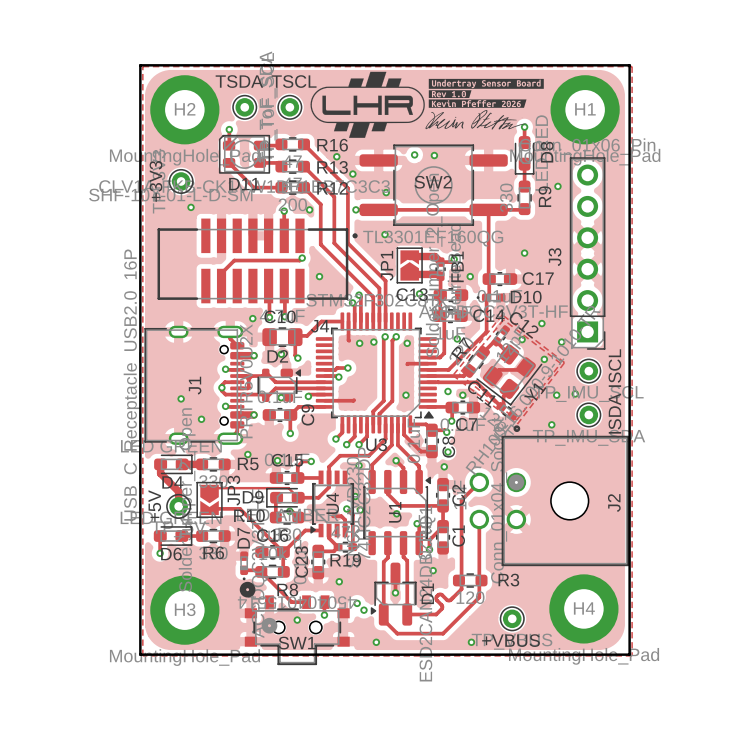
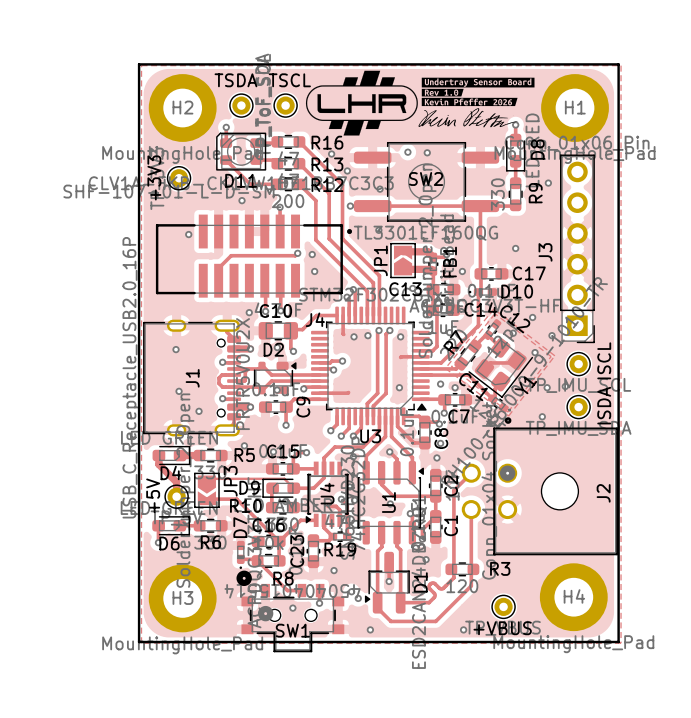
via: none -> (242, 200)
via: (191, 207) -> none
via: (309, 209) -> none
via: none -> (188, 234)
via: none -> (312, 254)
via position: (221, 387) -> (176, 349)

